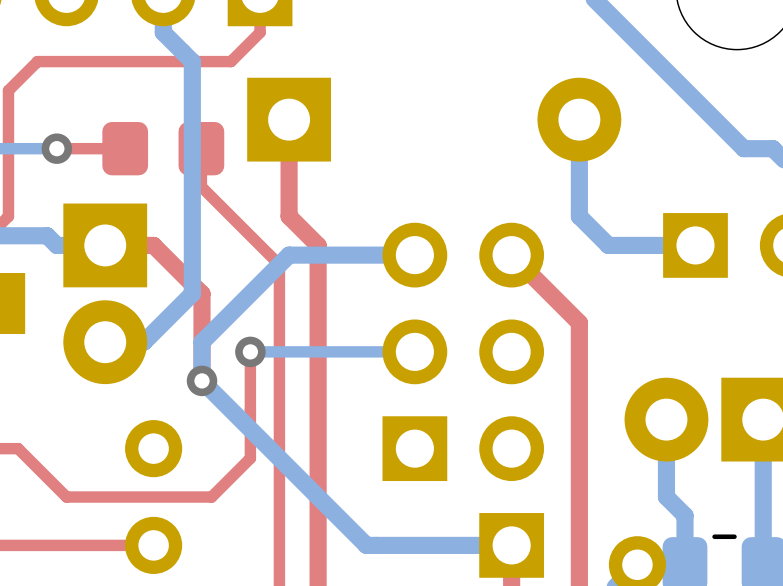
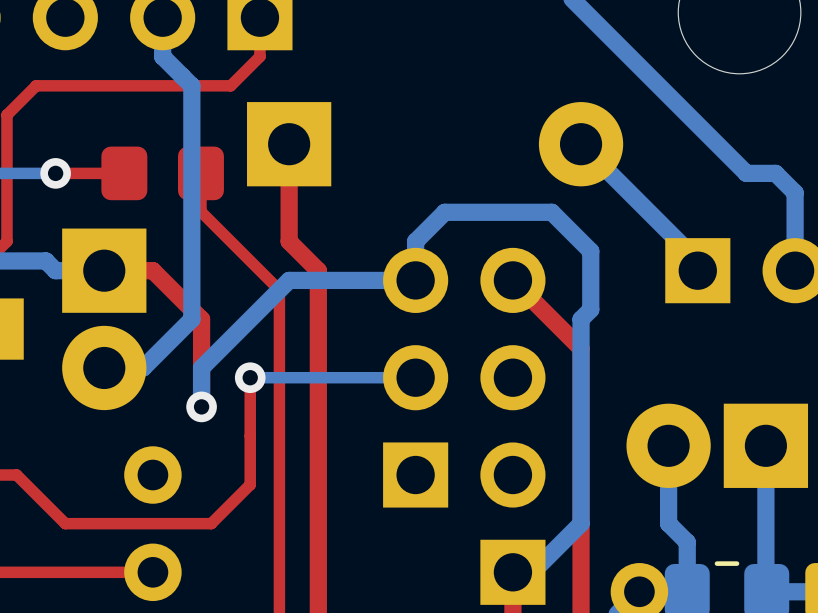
bottom track: (579, 119) (579, 216) -> (415, 280) (415, 241) (444, 212) (551, 212) (581, 241)
bottom track: (589, 226) (608, 245) (695, 245) -> (581, 144) (697, 260) (697, 270)
bottom track: (202, 380) (366, 545) (511, 545) -> (590, 251) (590, 309) (581, 319) (581, 523) (532, 572) (512, 572)

